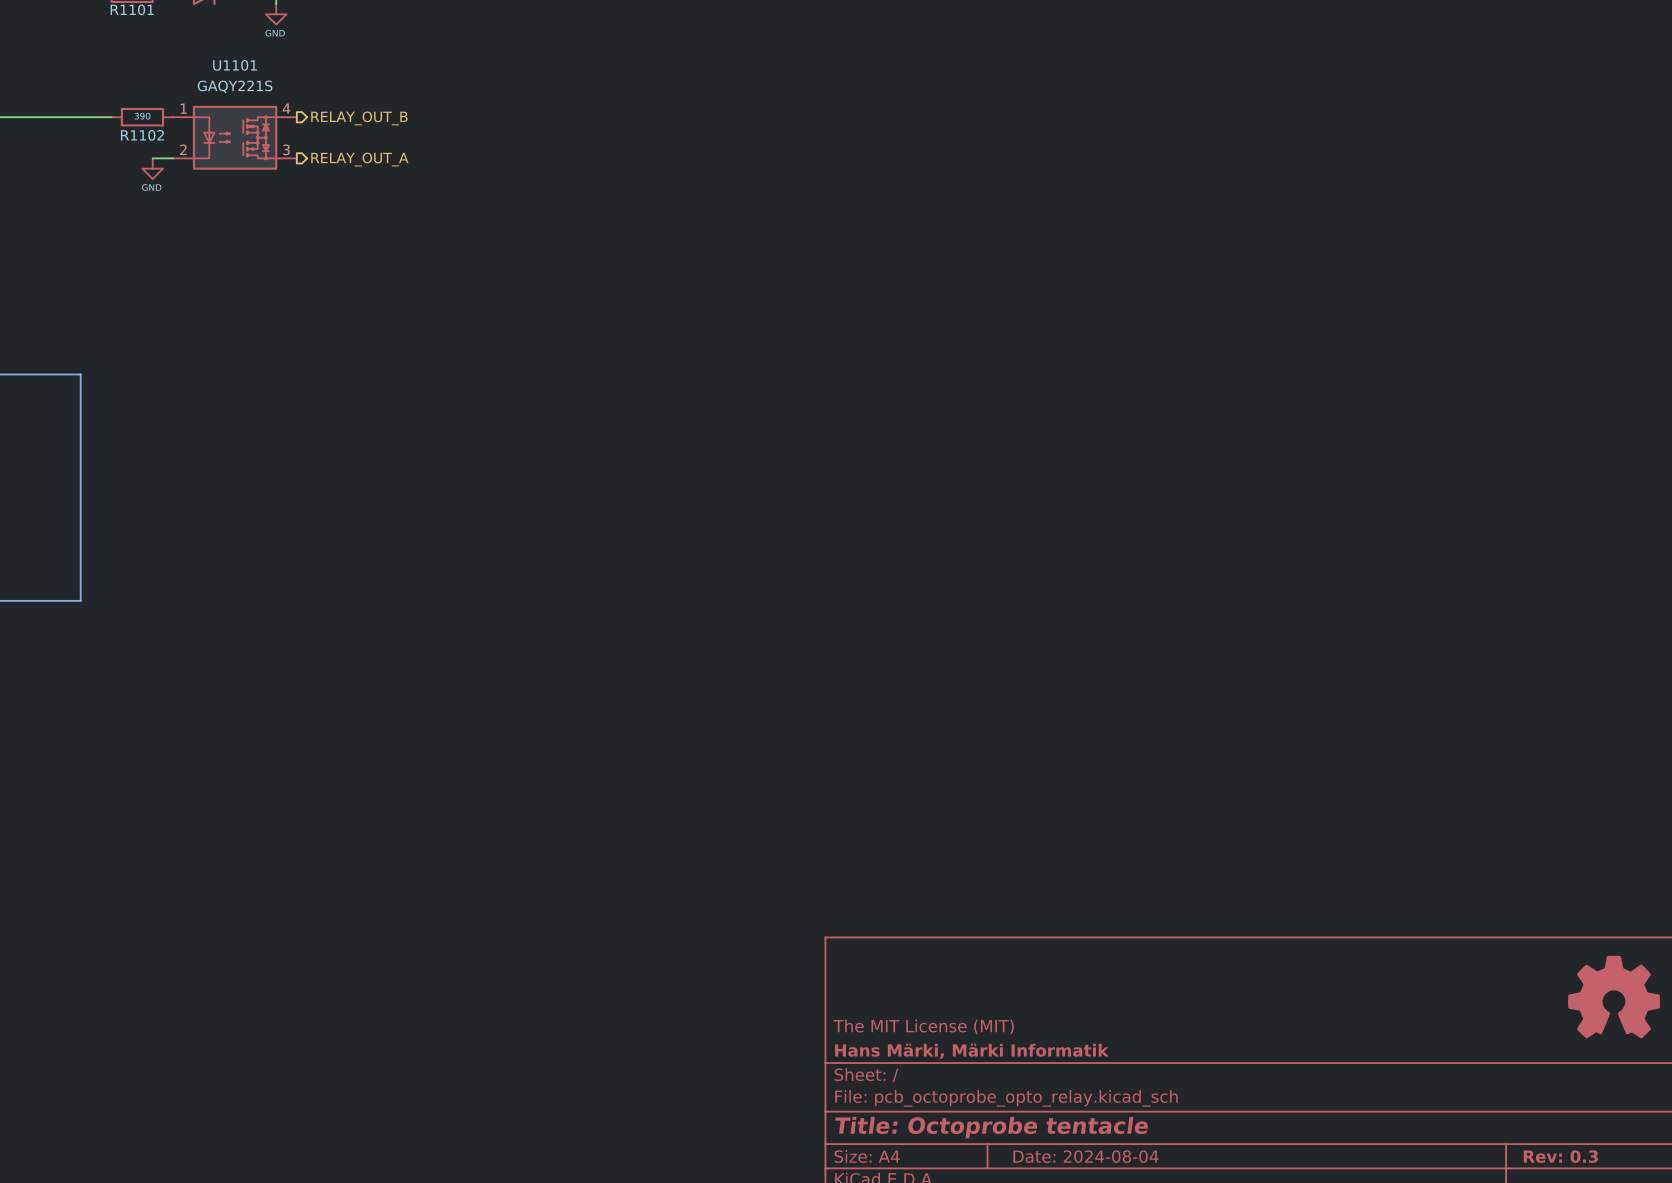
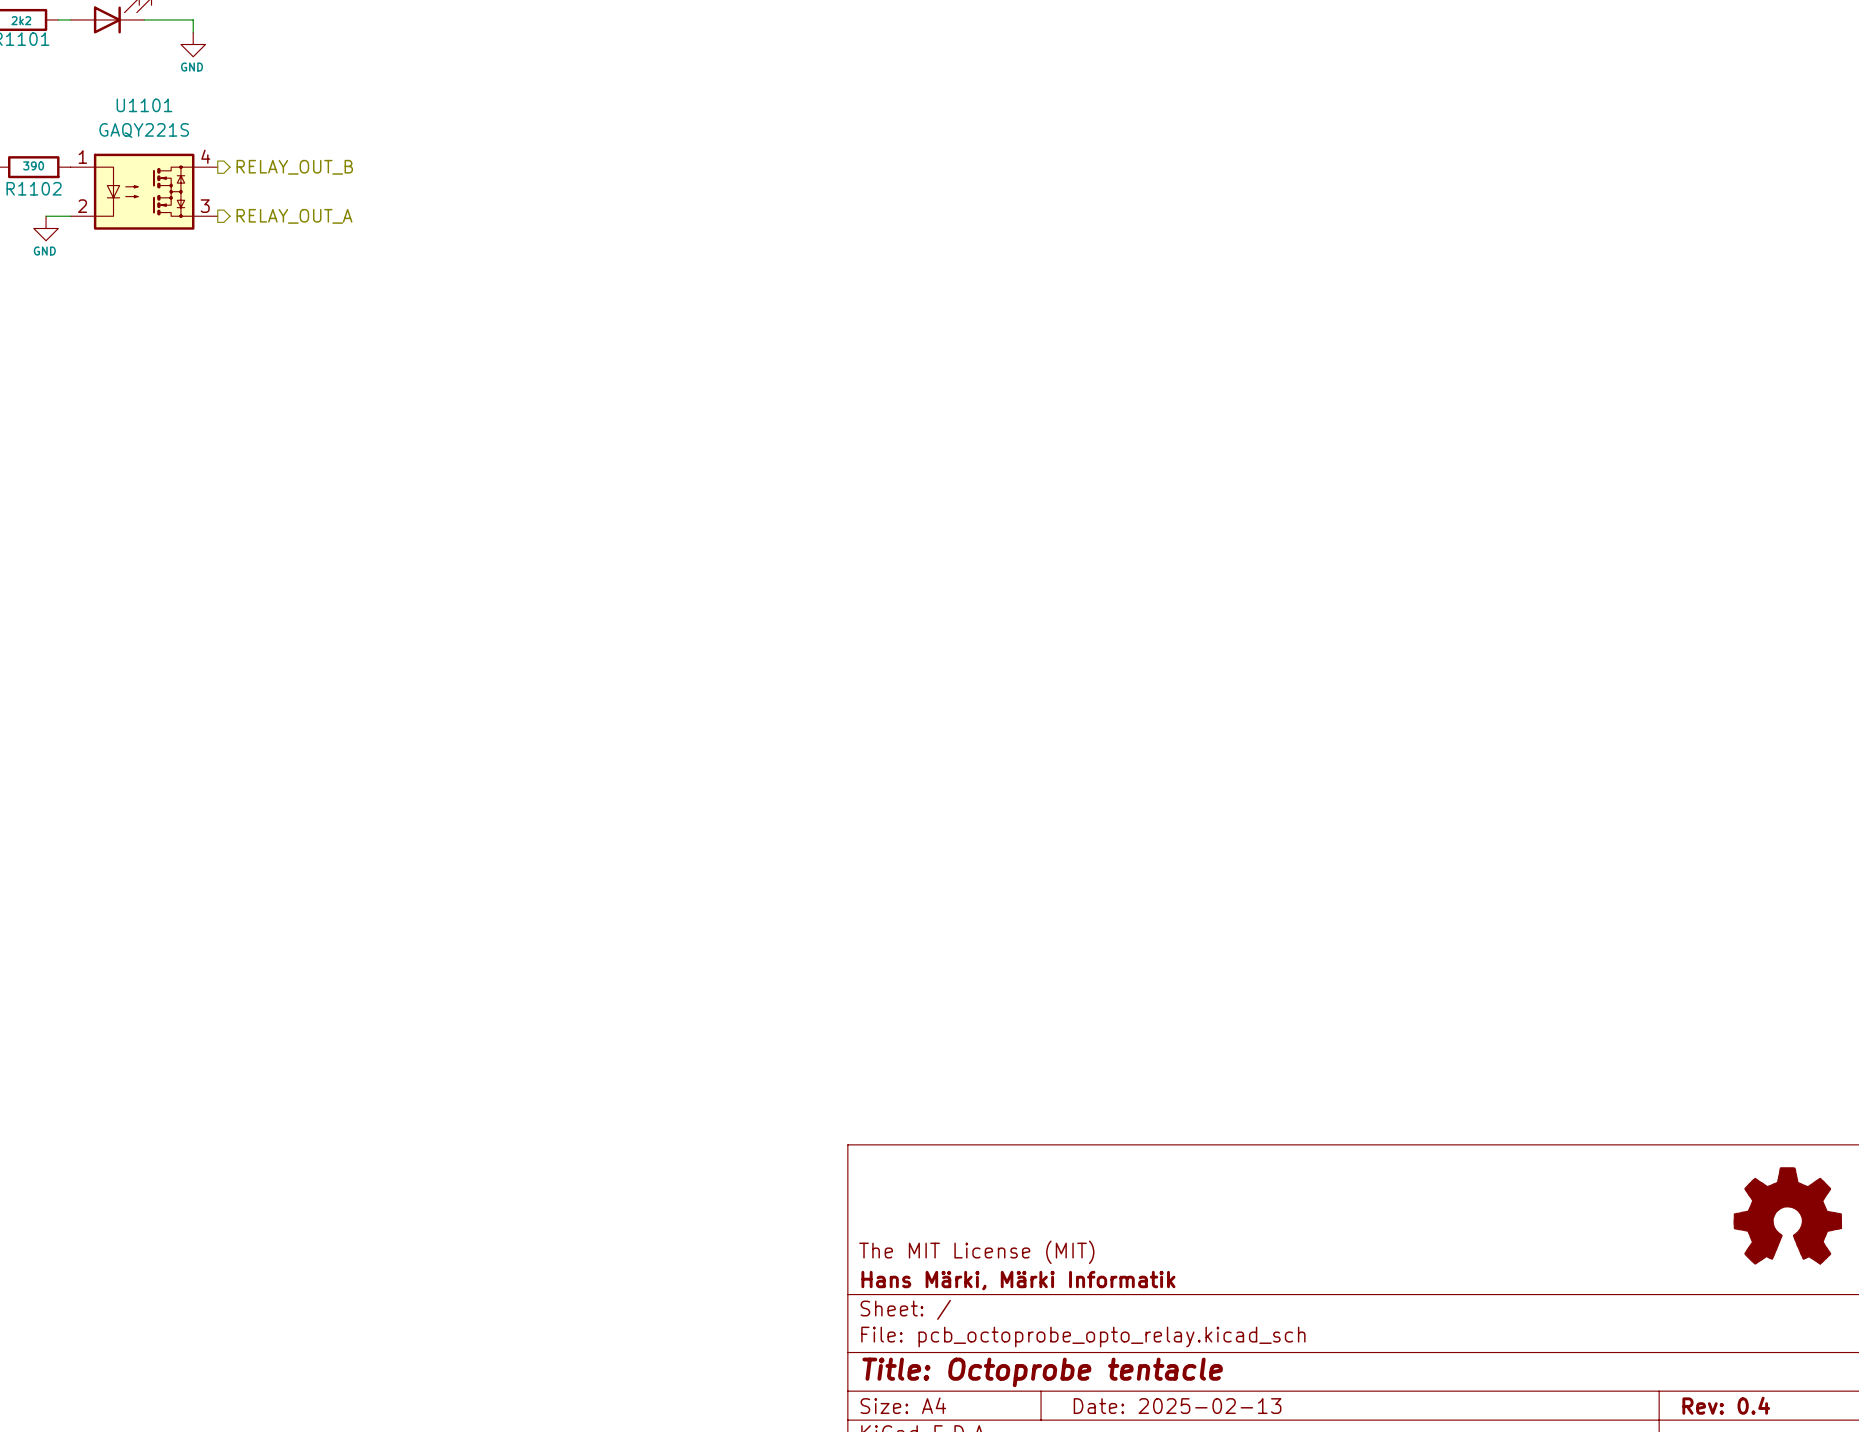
title block: Date: 2024-08-04 (1085, 1156) -> Date: 2025-02-13 (1177, 1406)
title block: Rev: 0.3 (1560, 1156) -> Rev: 0.4 (1726, 1405)

